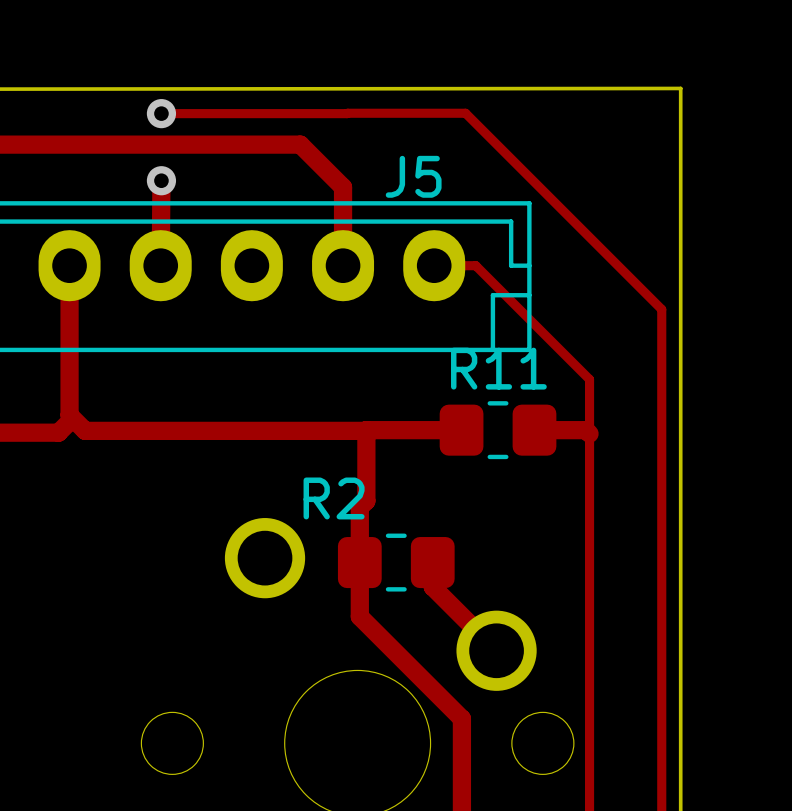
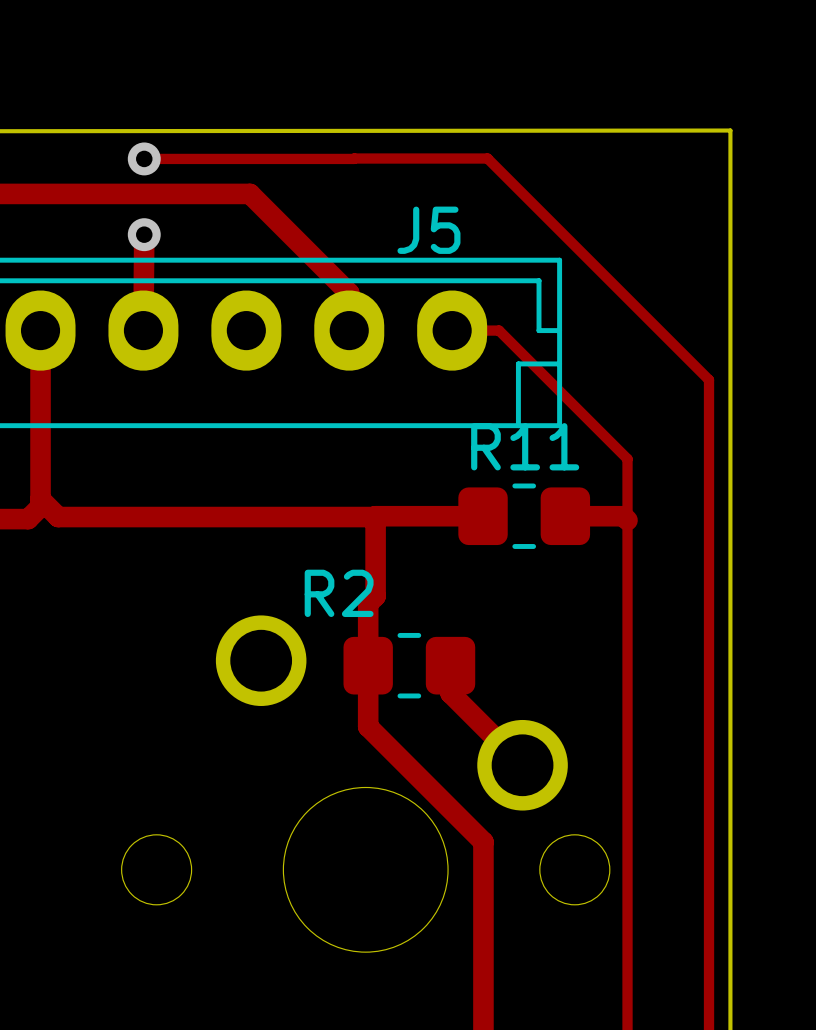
track: (255, 144) (300, 144) (343, 187) (343, 232) -> (250, 193) (349, 293)

